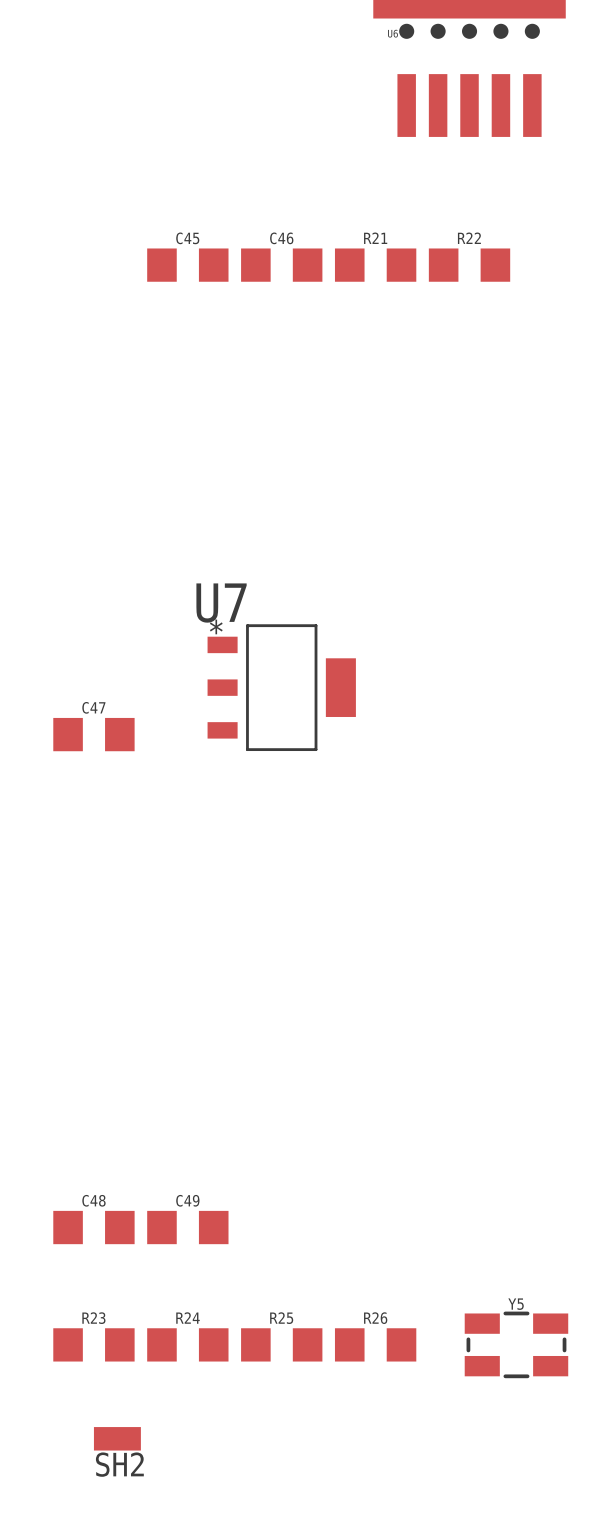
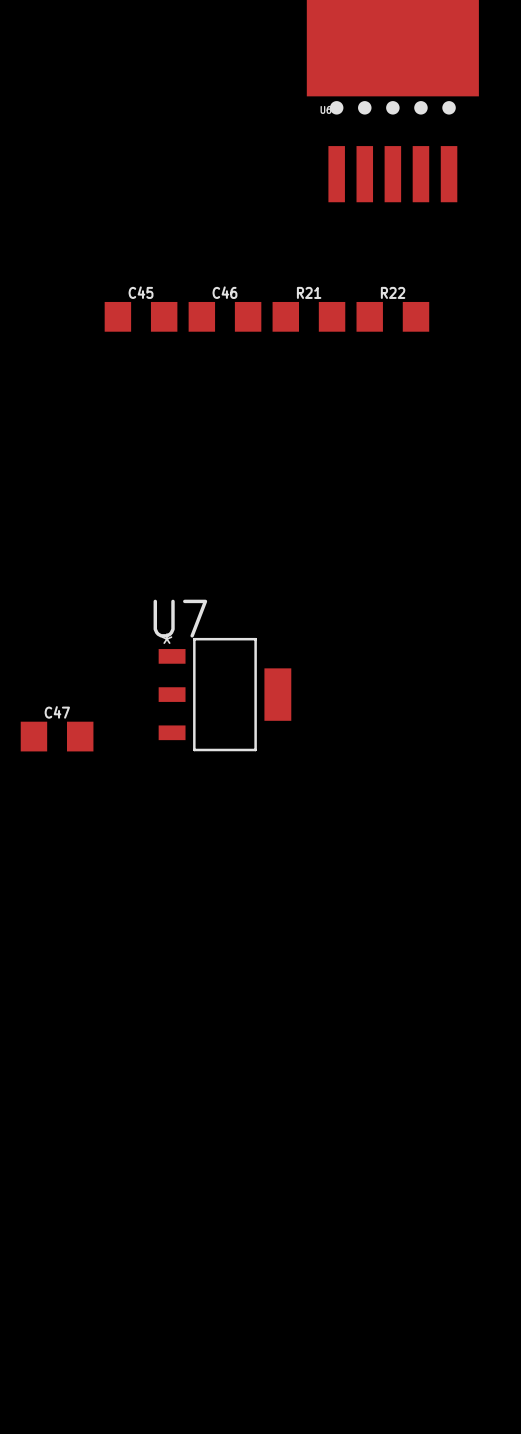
C48: (93, 1227) -> none
C49: (187, 1227) -> none
R23: (93, 1344) -> none
R24: (187, 1344) -> none
R25: (281, 1344) -> none
R26: (375, 1344) -> none
Y5: (516, 1344) -> none
SH2: (117, 1438) -> none

